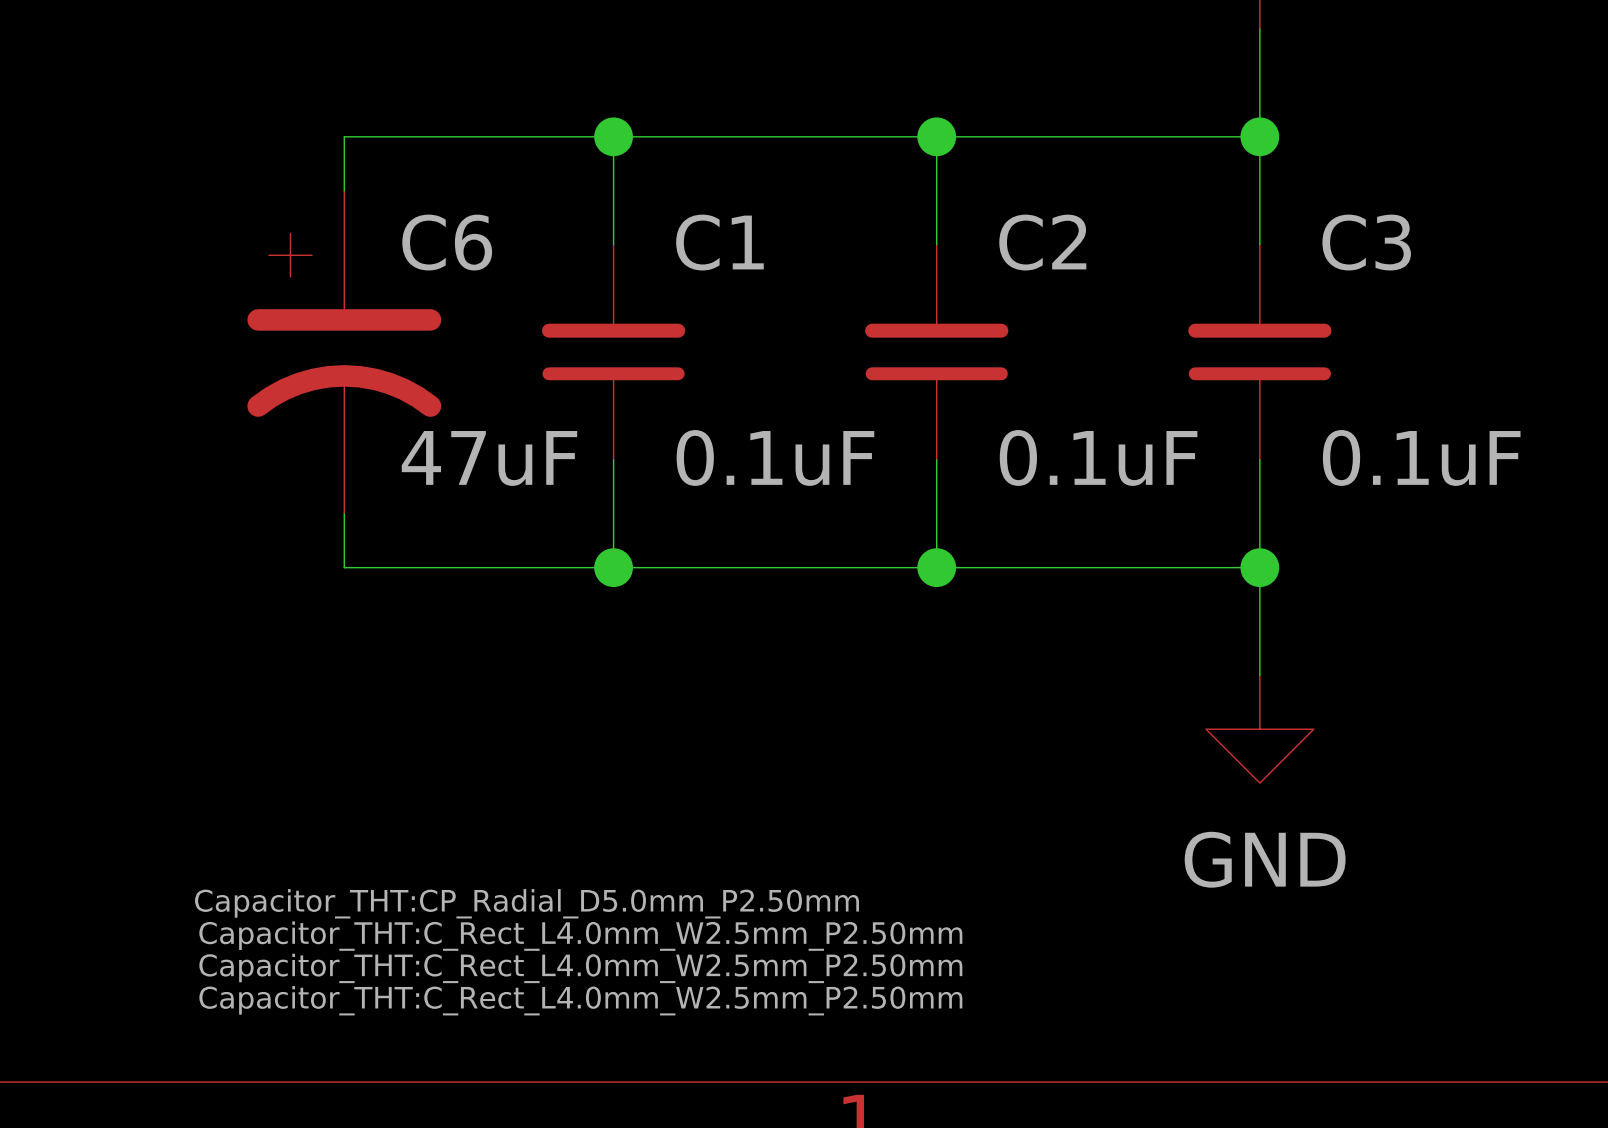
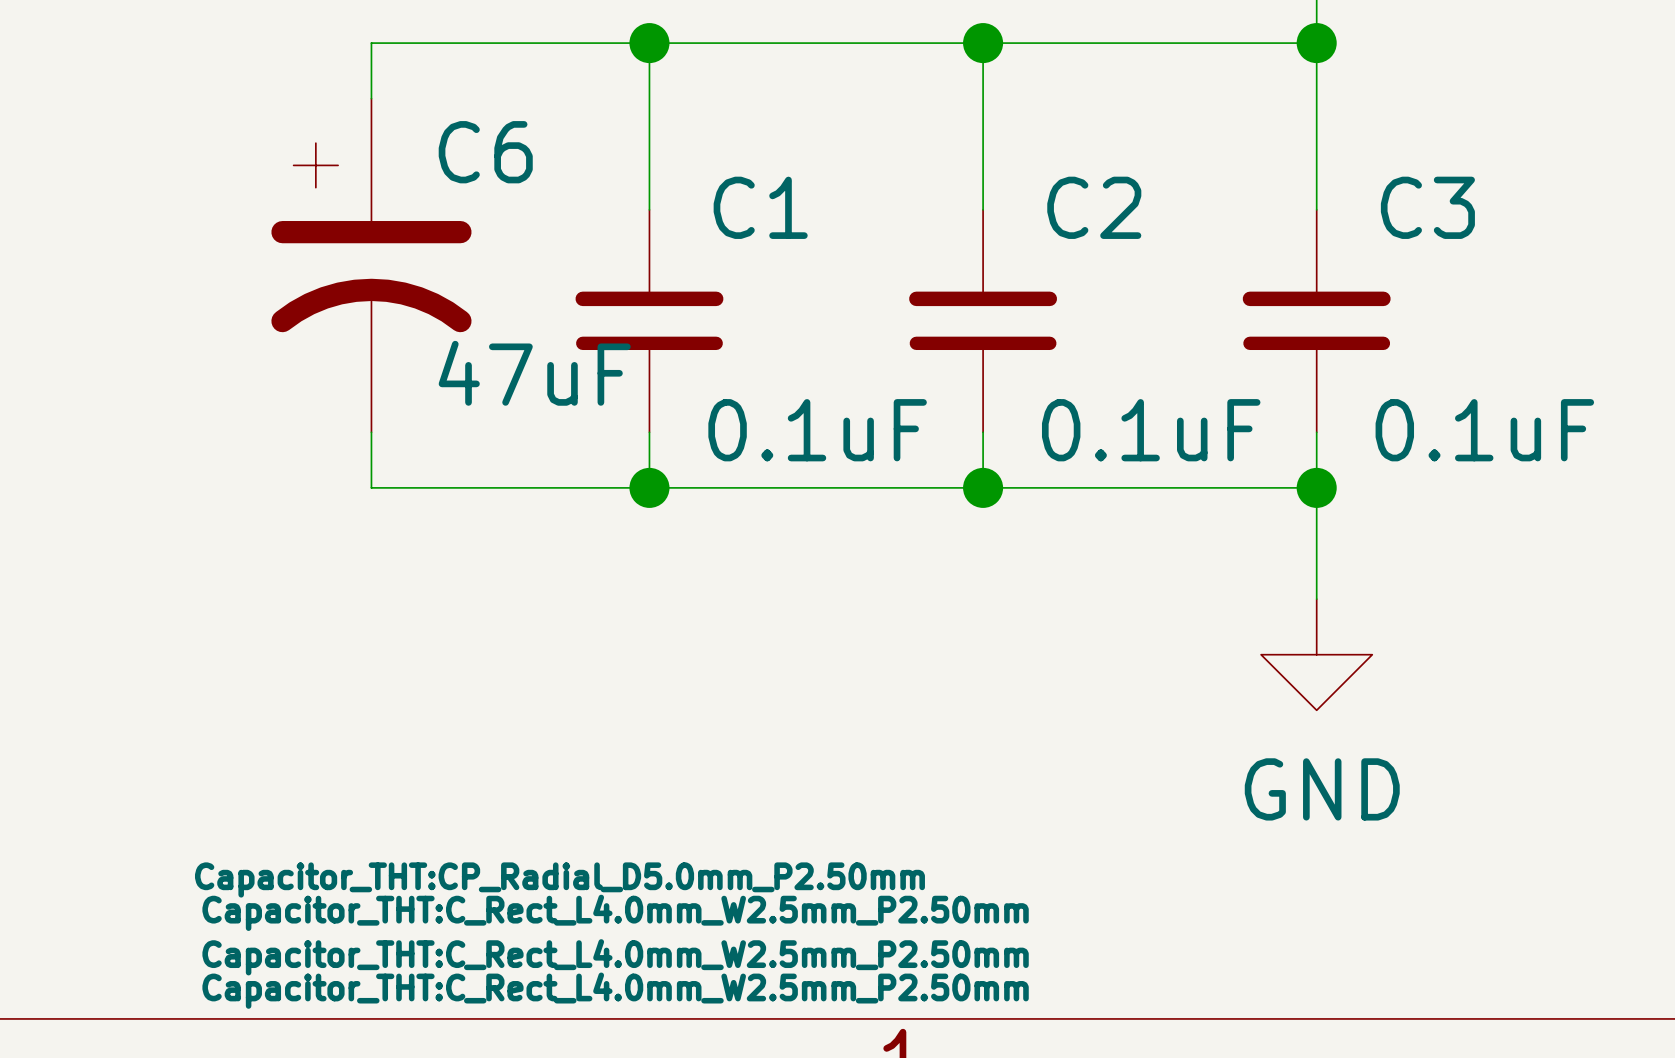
C1 position: (613, 352) -> (649, 321)
C2 position: (936, 352) -> (983, 321)
C3 position: (1259, 352) -> (1316, 321)
C6 text position: Capacitor_THT:CP_Radial_D5.0mm_P2.50mm (526, 903) -> Capacitor_THT:CP_Radial_D5.0mm_P2.50mm (559, 879)
C2 text position: Capacitor_THT:C_Rect_L4.0mm_W2.5mm_P2.50mm (580, 936) -> Capacitor_THT:C_Rect_L4.0mm_W2.5mm_P2.50mm (615, 912)

